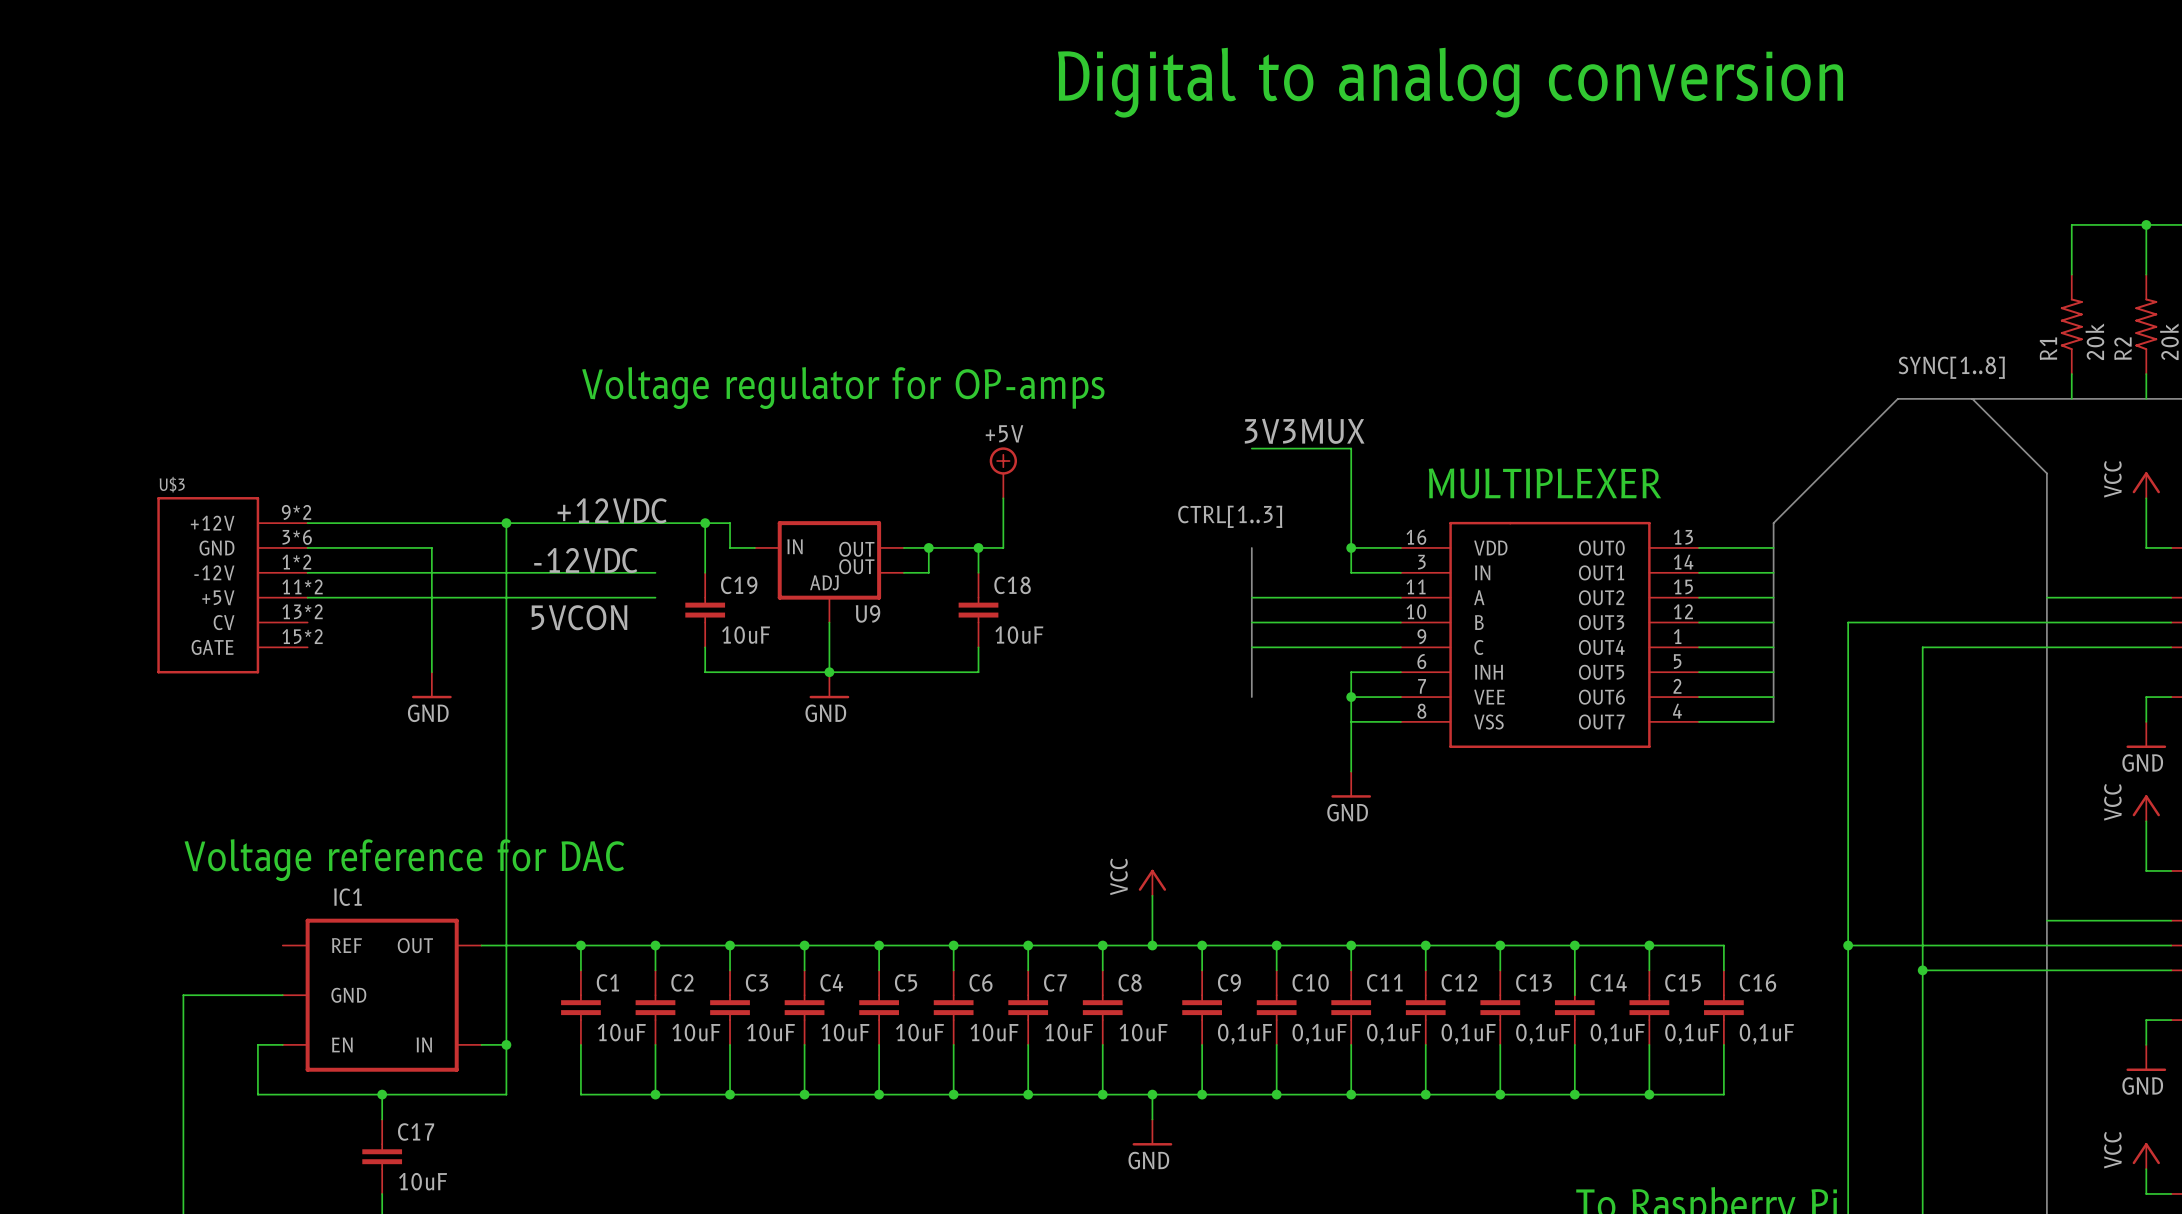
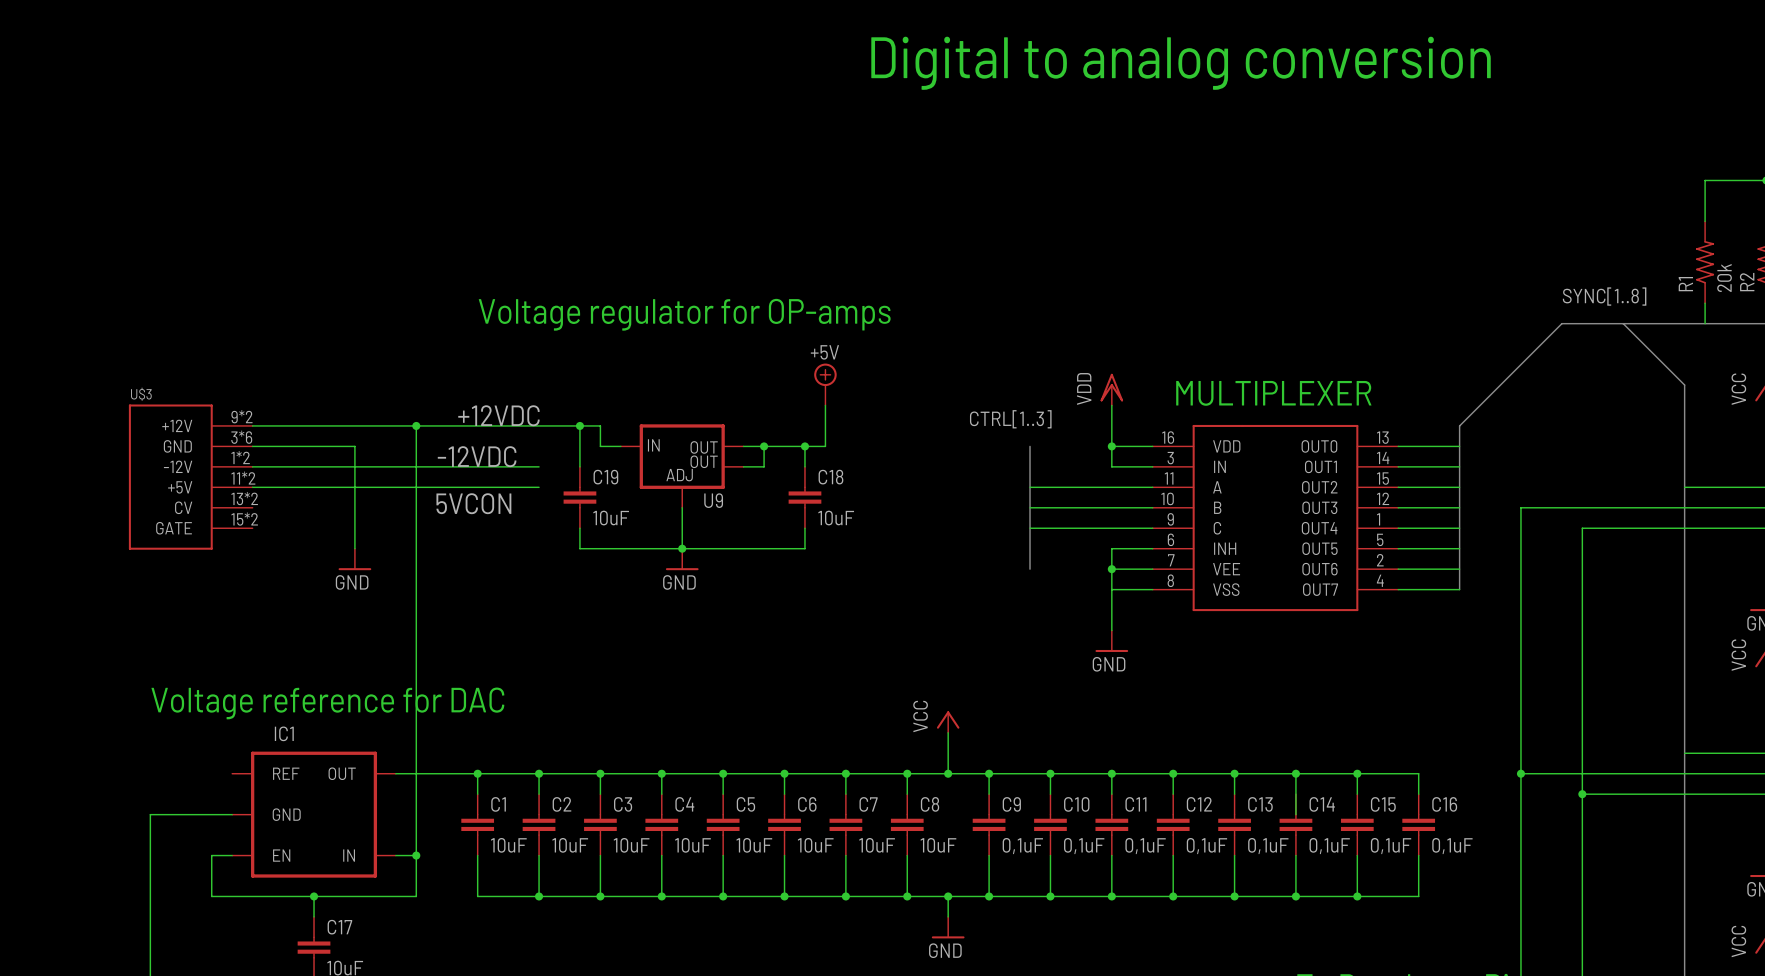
label: 3V3MUX (1304, 431) -> none
wire: (1251, 448) (1351, 448) (1351, 498) -> none
power symbol: none -> VDD (1111, 389)

